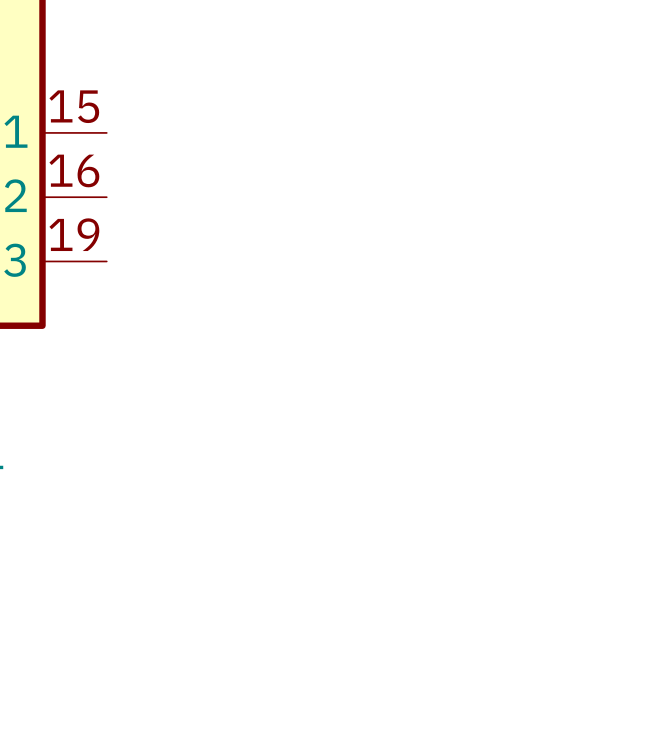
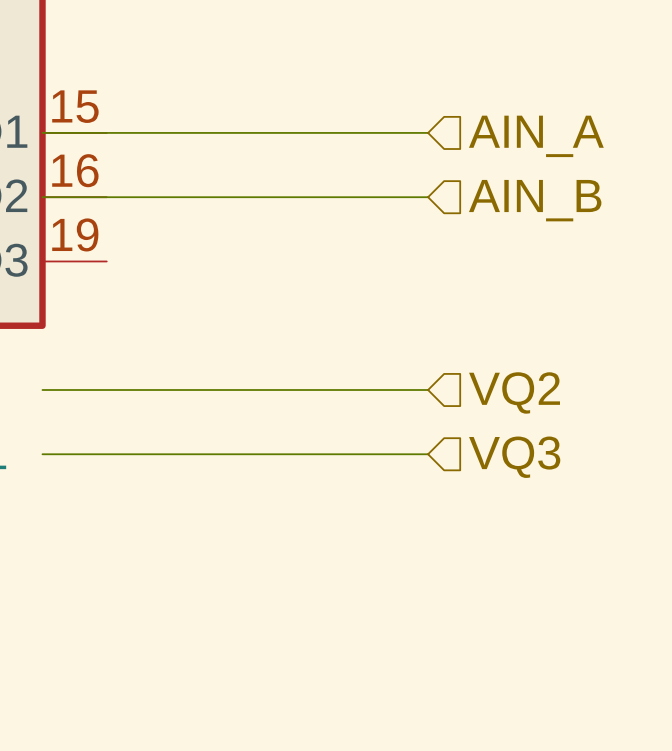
wire: none -> (42, 132) (428, 132)
hierarchical label: none -> AIN_A (536, 136)
wire: none -> (42, 197) (428, 197)
hierarchical label: none -> AIN_B (535, 200)
wire: none -> (42, 390) (428, 390)
hierarchical label: none -> VQ2 (514, 392)
wire: none -> (42, 454) (428, 454)
hierarchical label: none -> VQ3 (514, 457)

